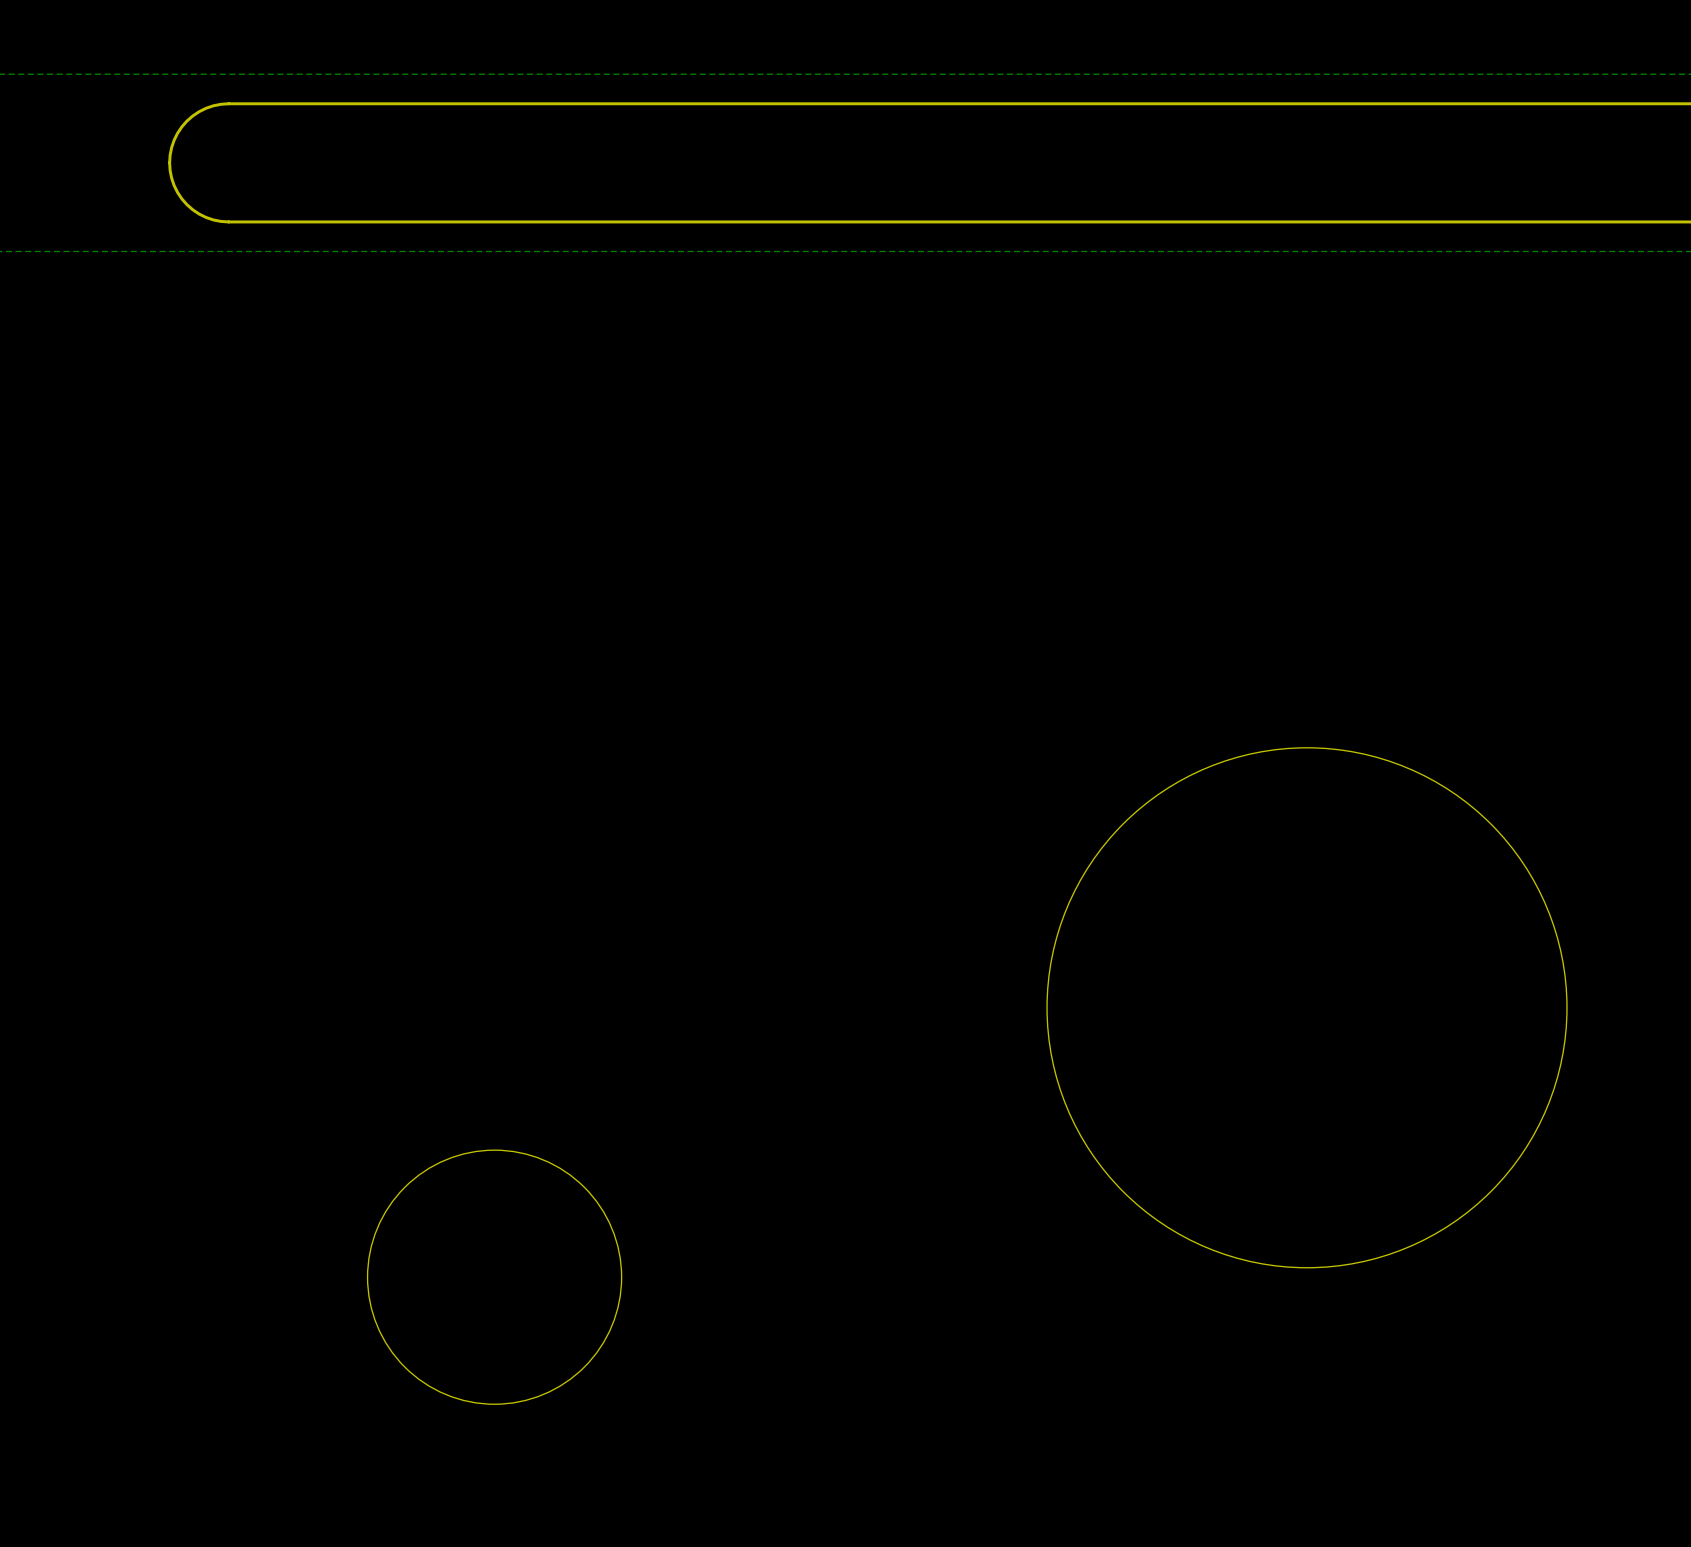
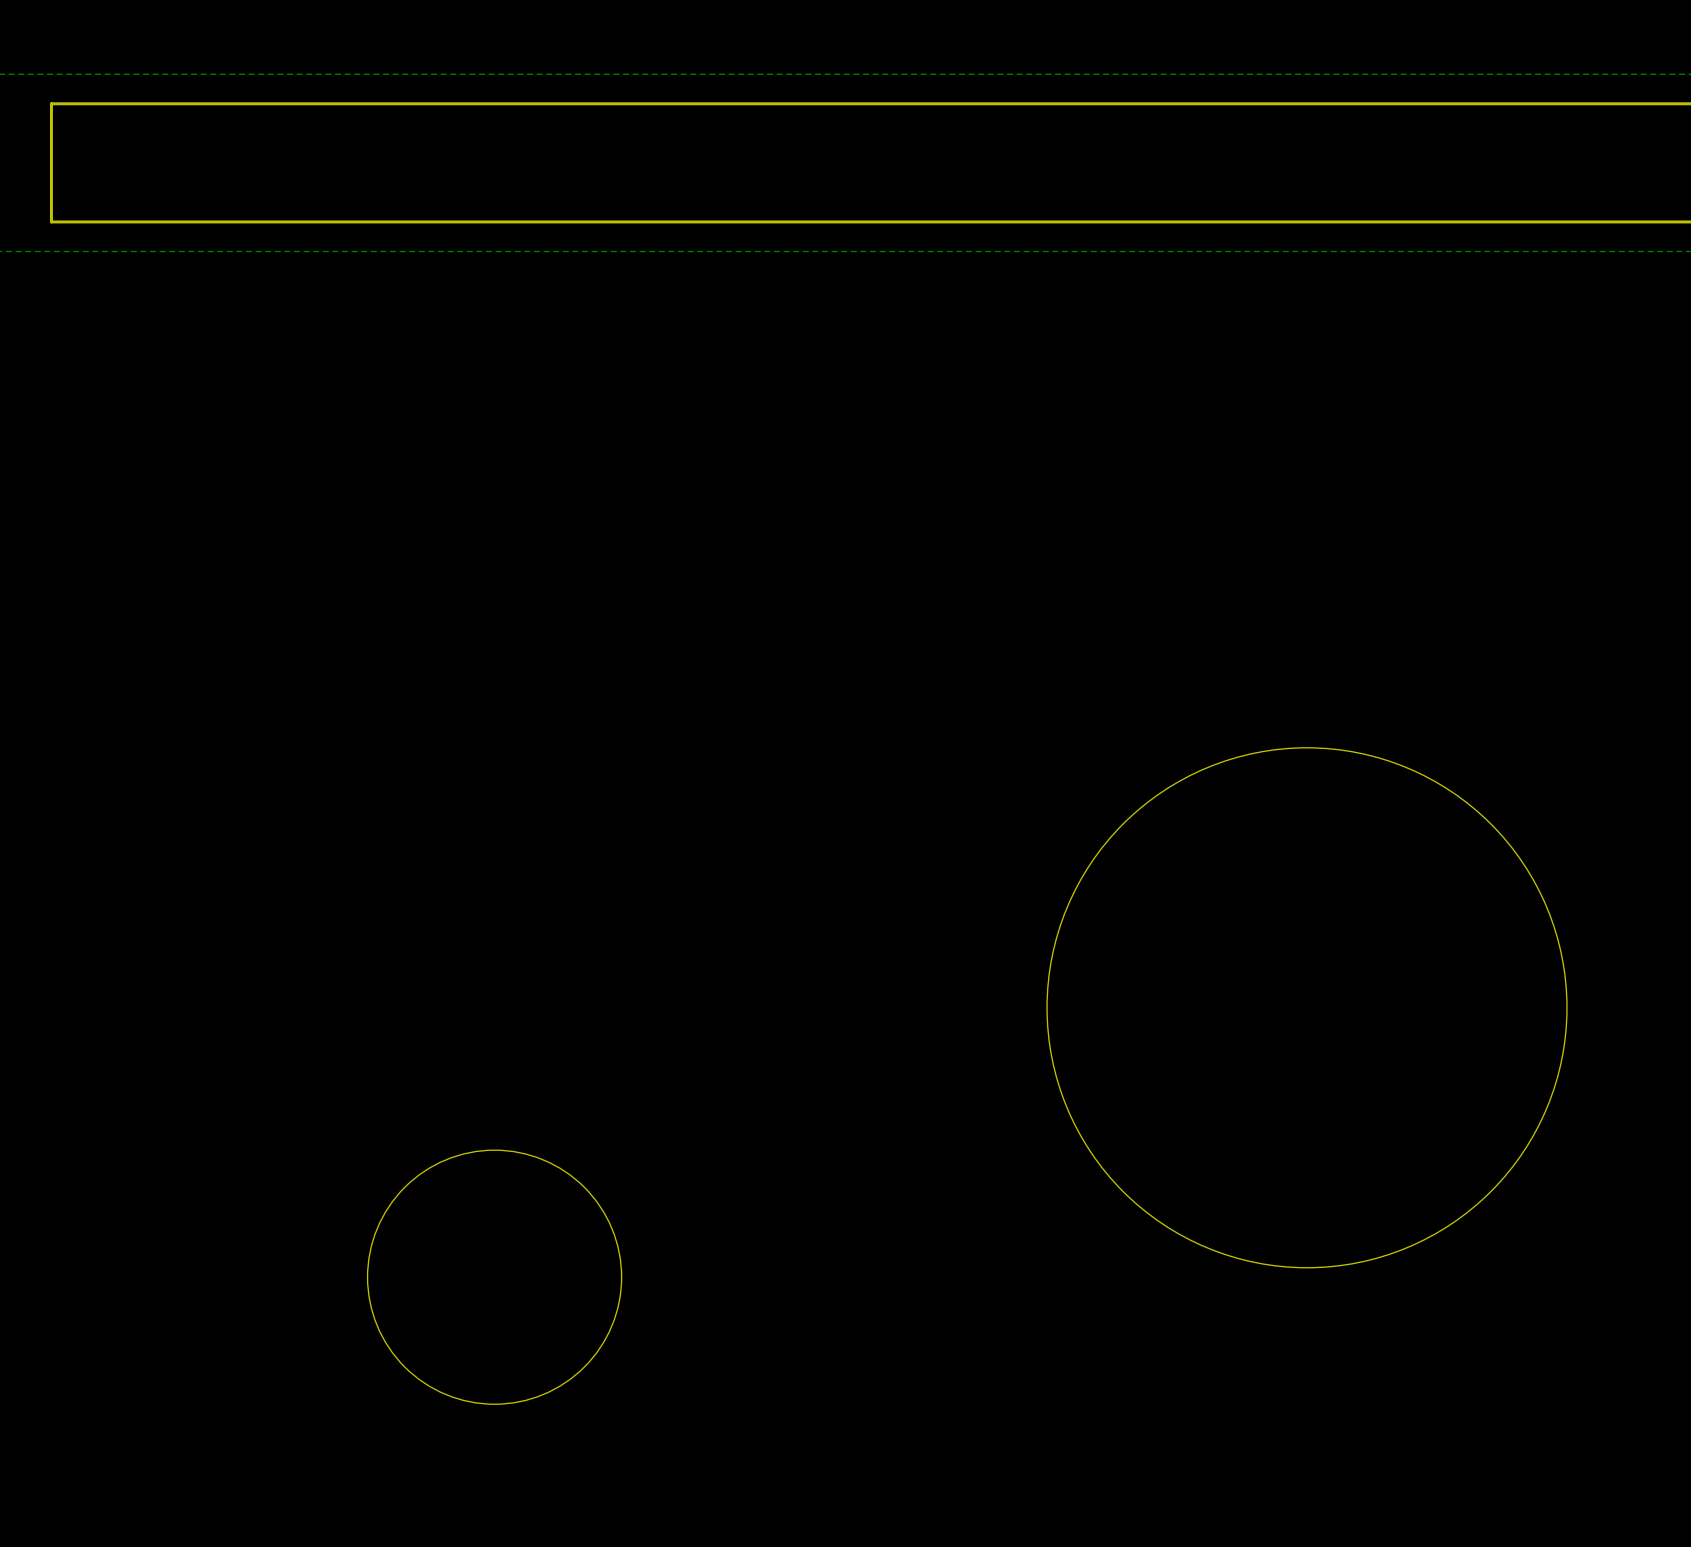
board edge: (228, 103) (206, 108) (186, 121) (174, 140) (169, 162) (174, 185) (186, 204) (206, 217) (228, 221) -> (228, 103) (51, 103) (51, 221) (228, 221)

